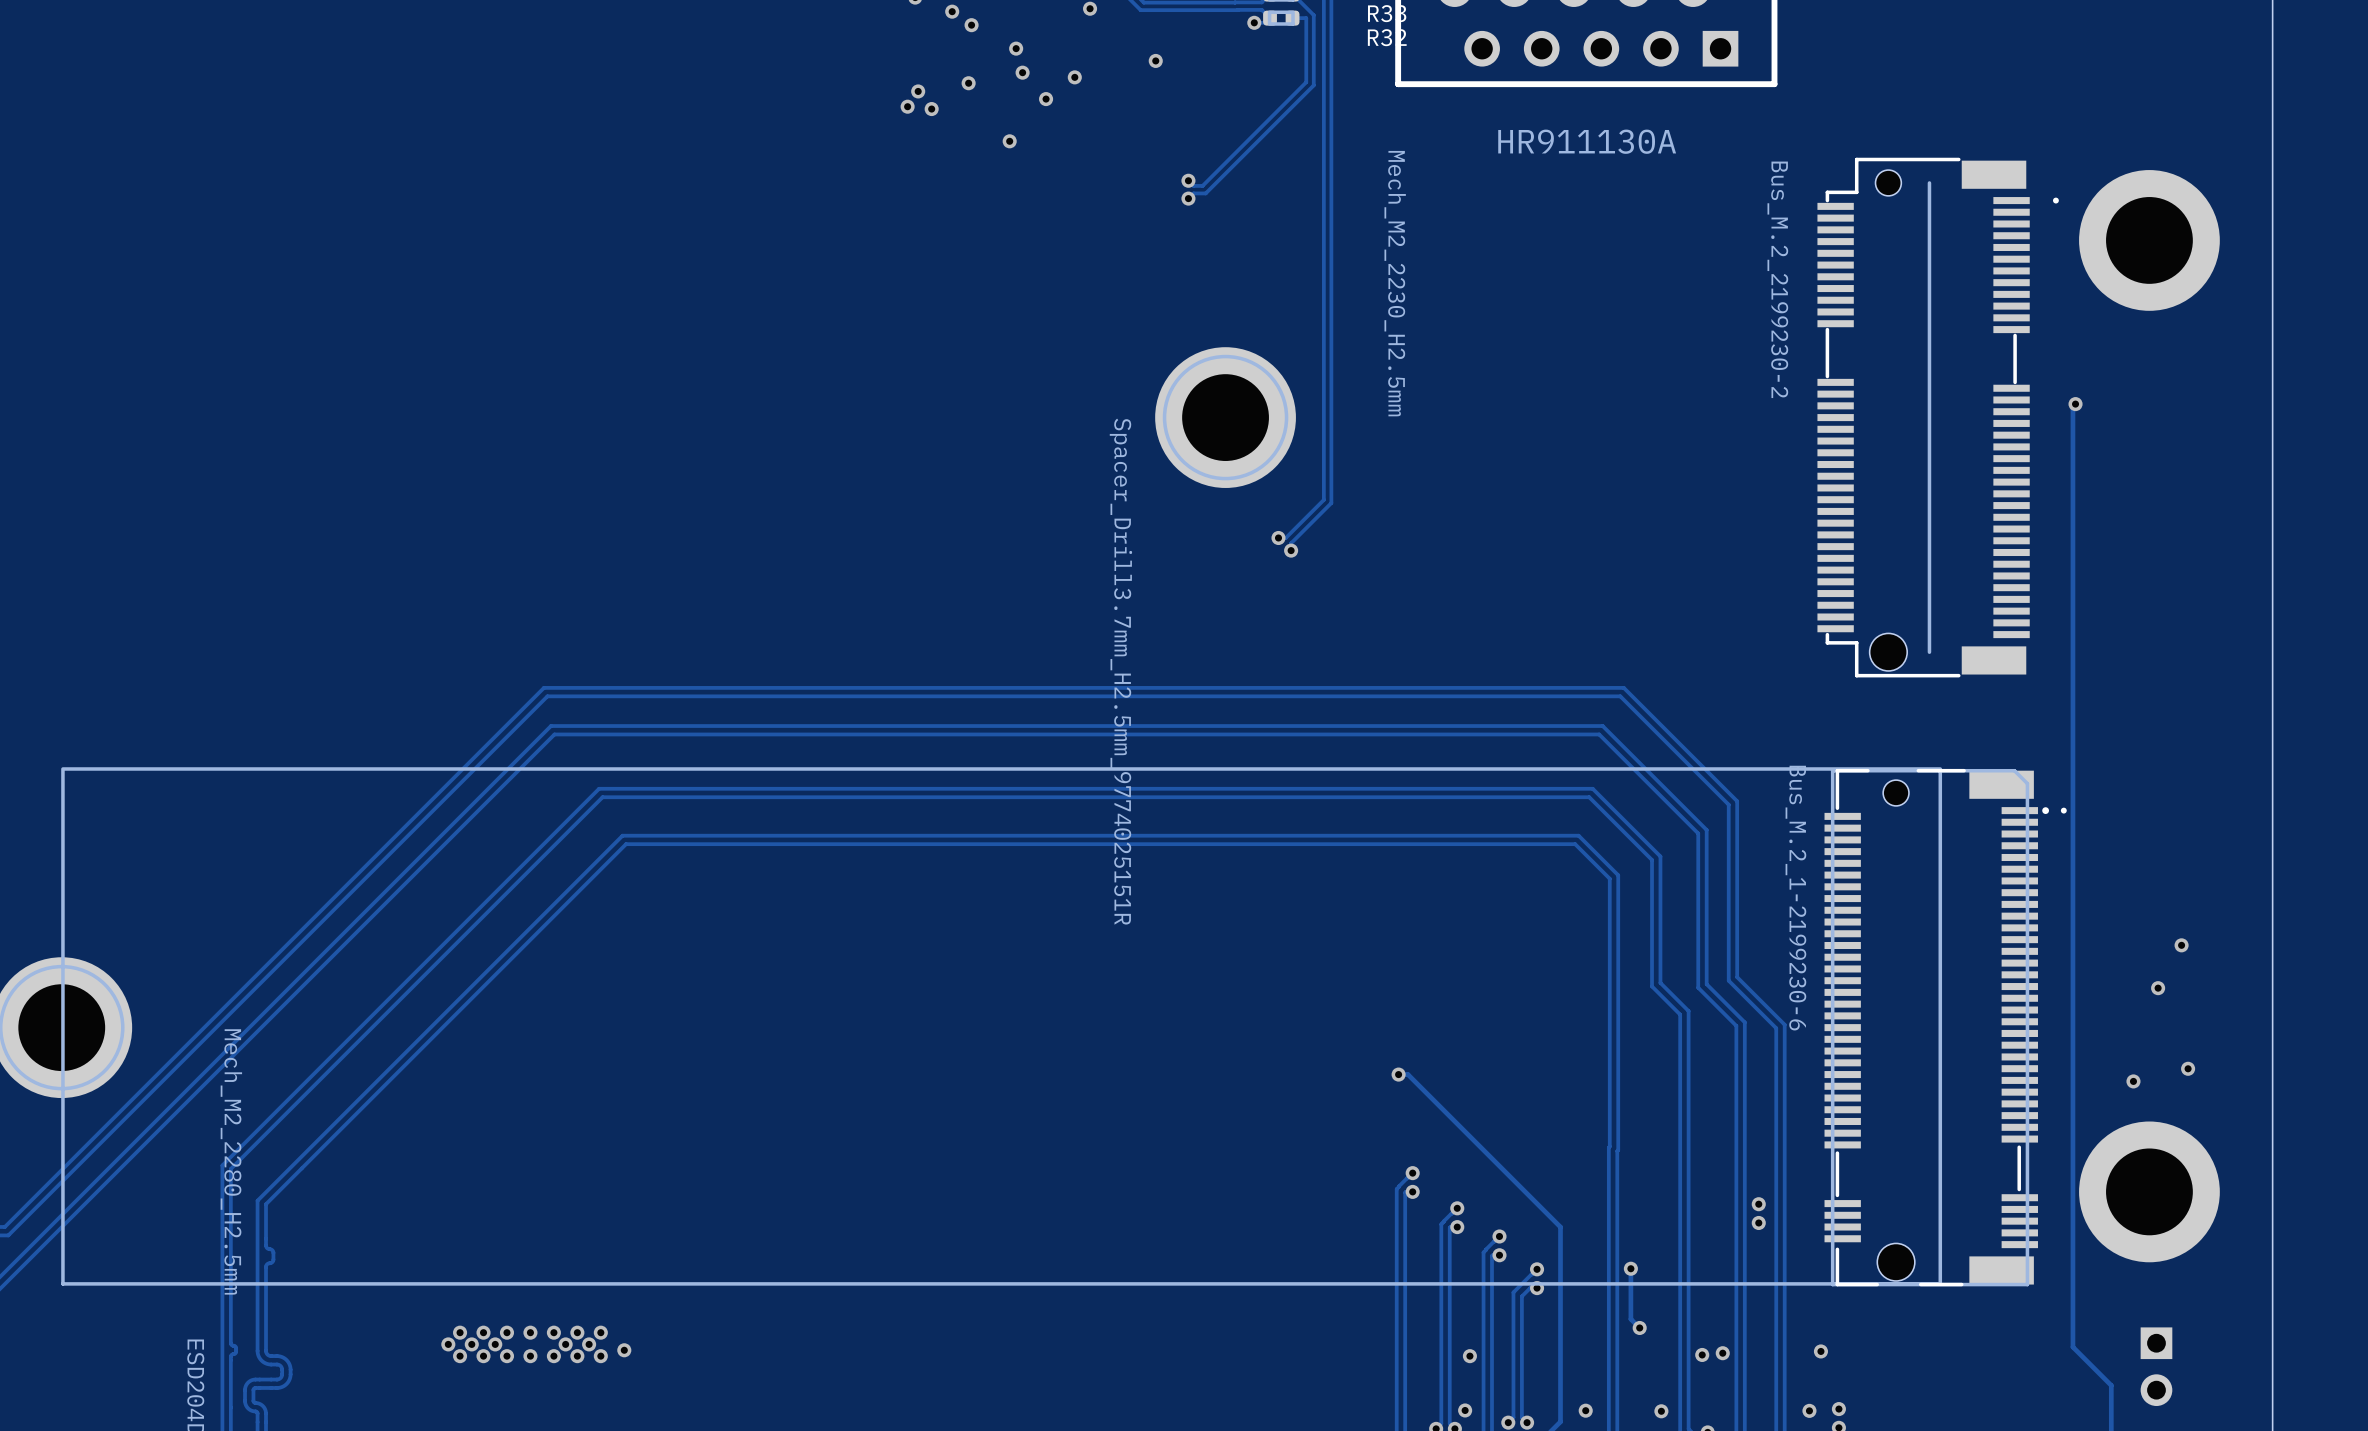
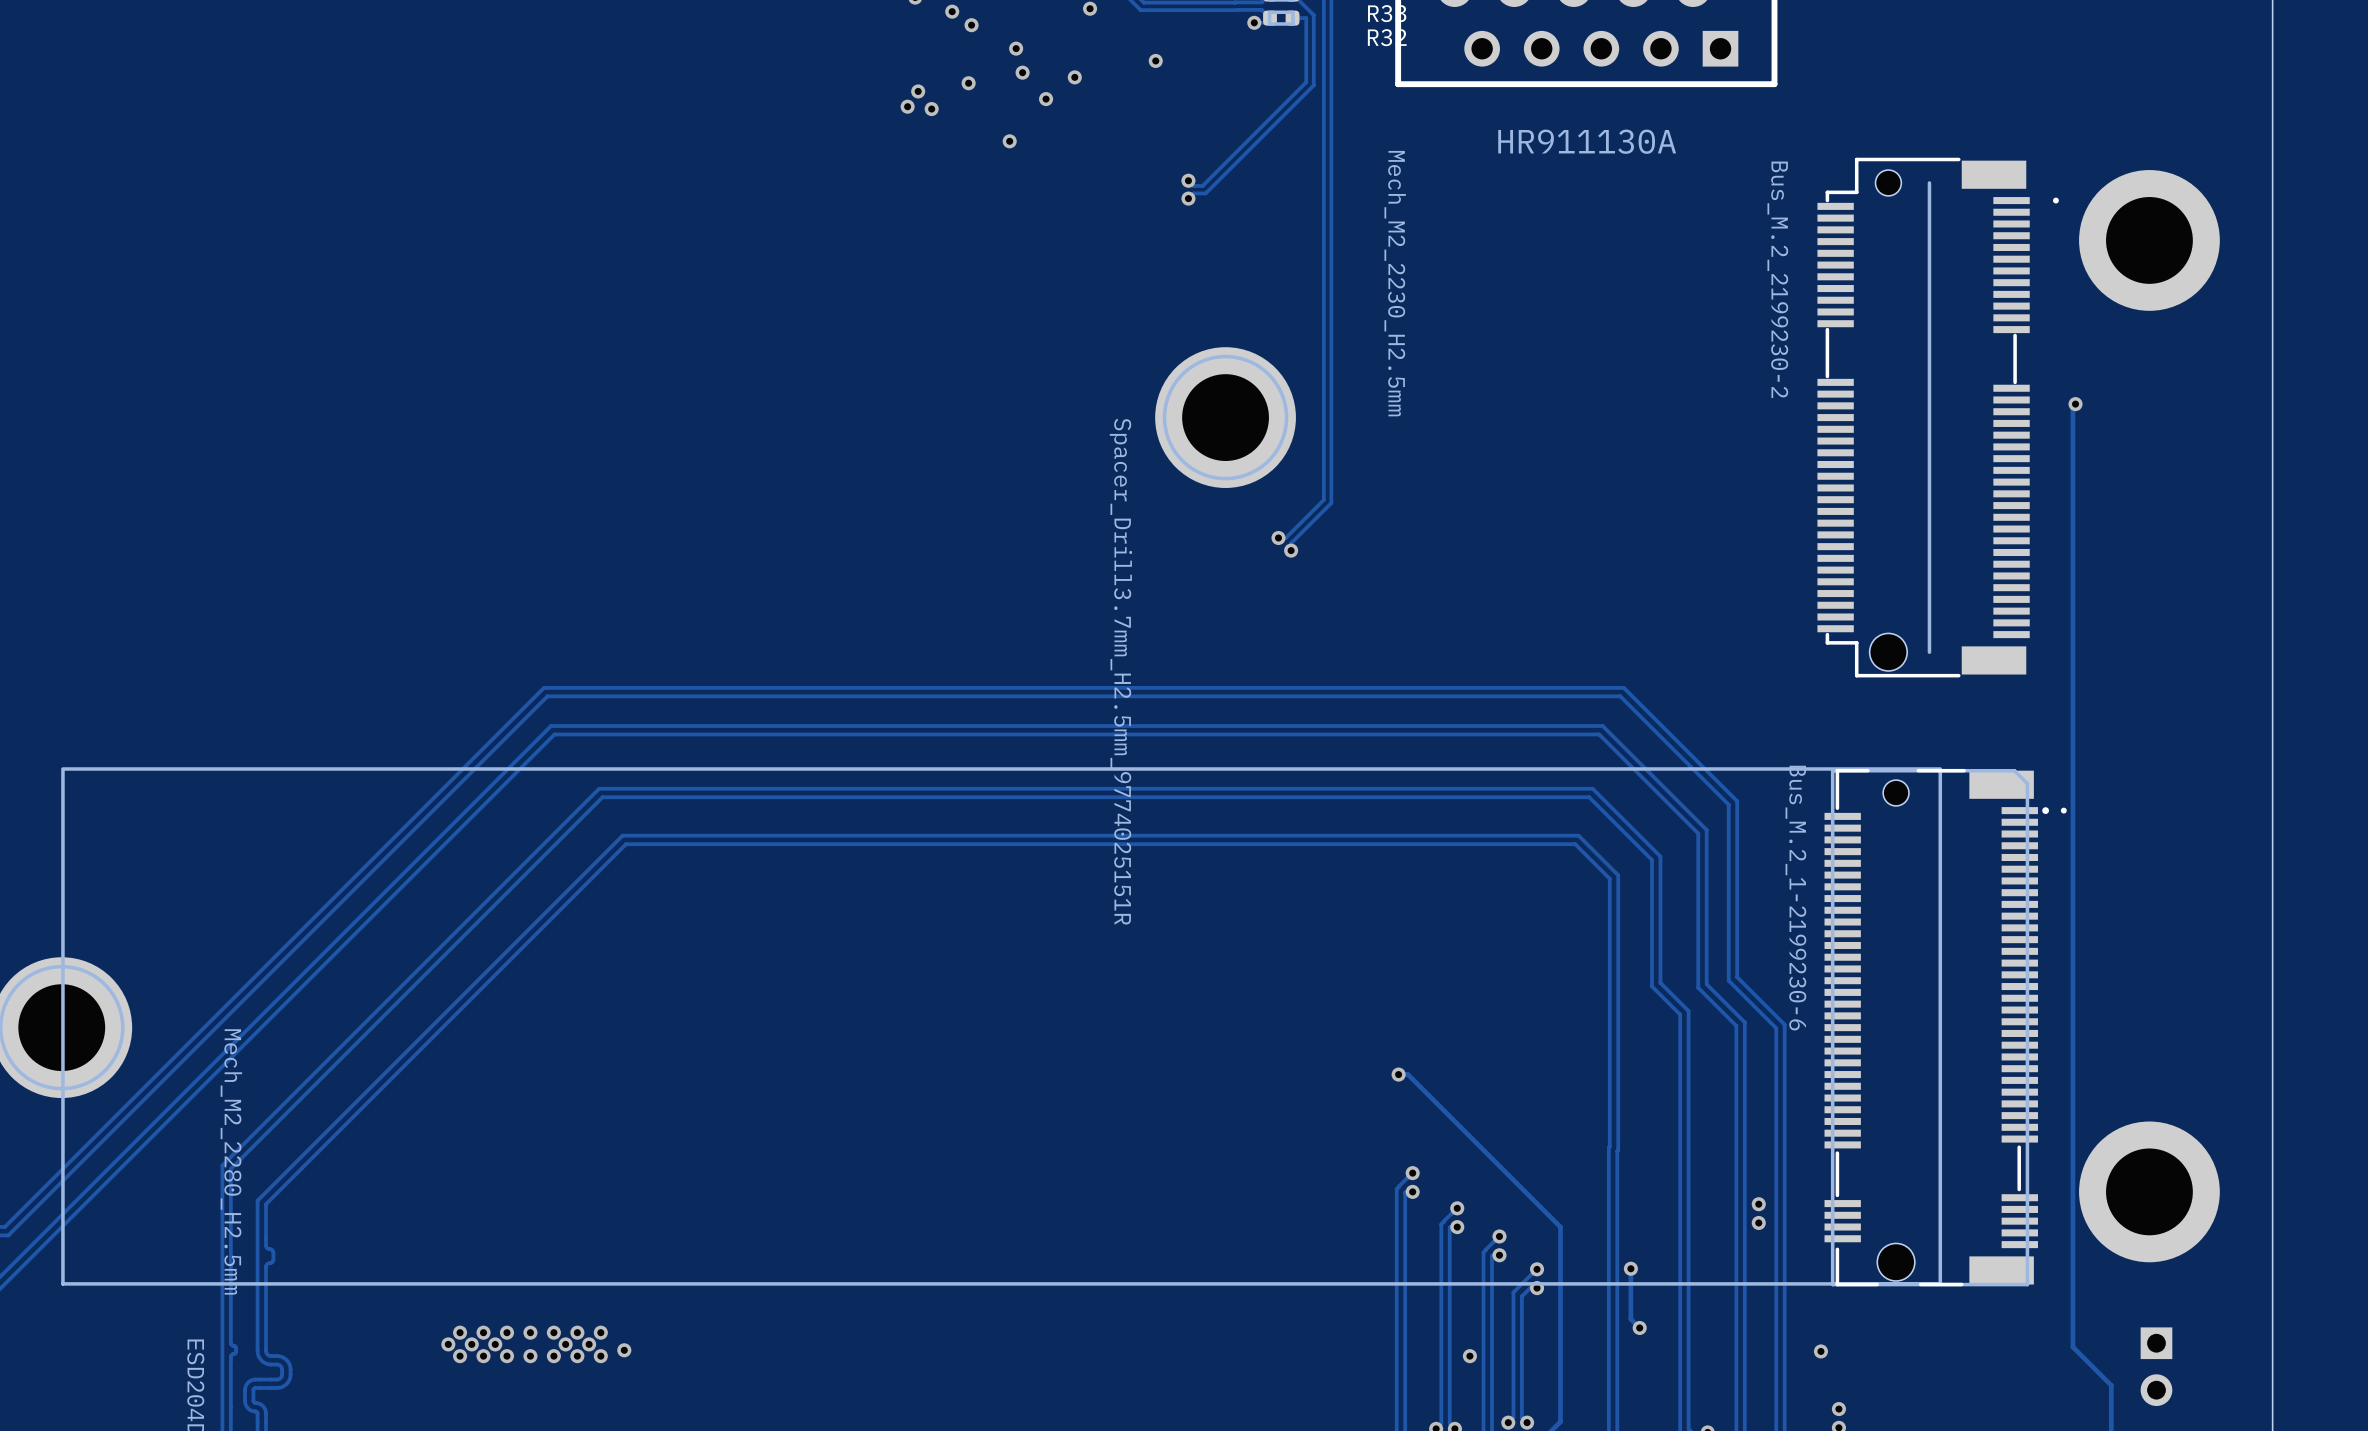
via: (2181, 945) -> none
via: (2158, 988) -> none
via: (2188, 1068) -> none
via: (2133, 1081) -> none
via: (1722, 1353) -> none
via: (1702, 1354) -> none
via: (1465, 1410) -> none
via: (1585, 1410) -> none
via: (1809, 1410) -> none
via: (1661, 1411) -> none

